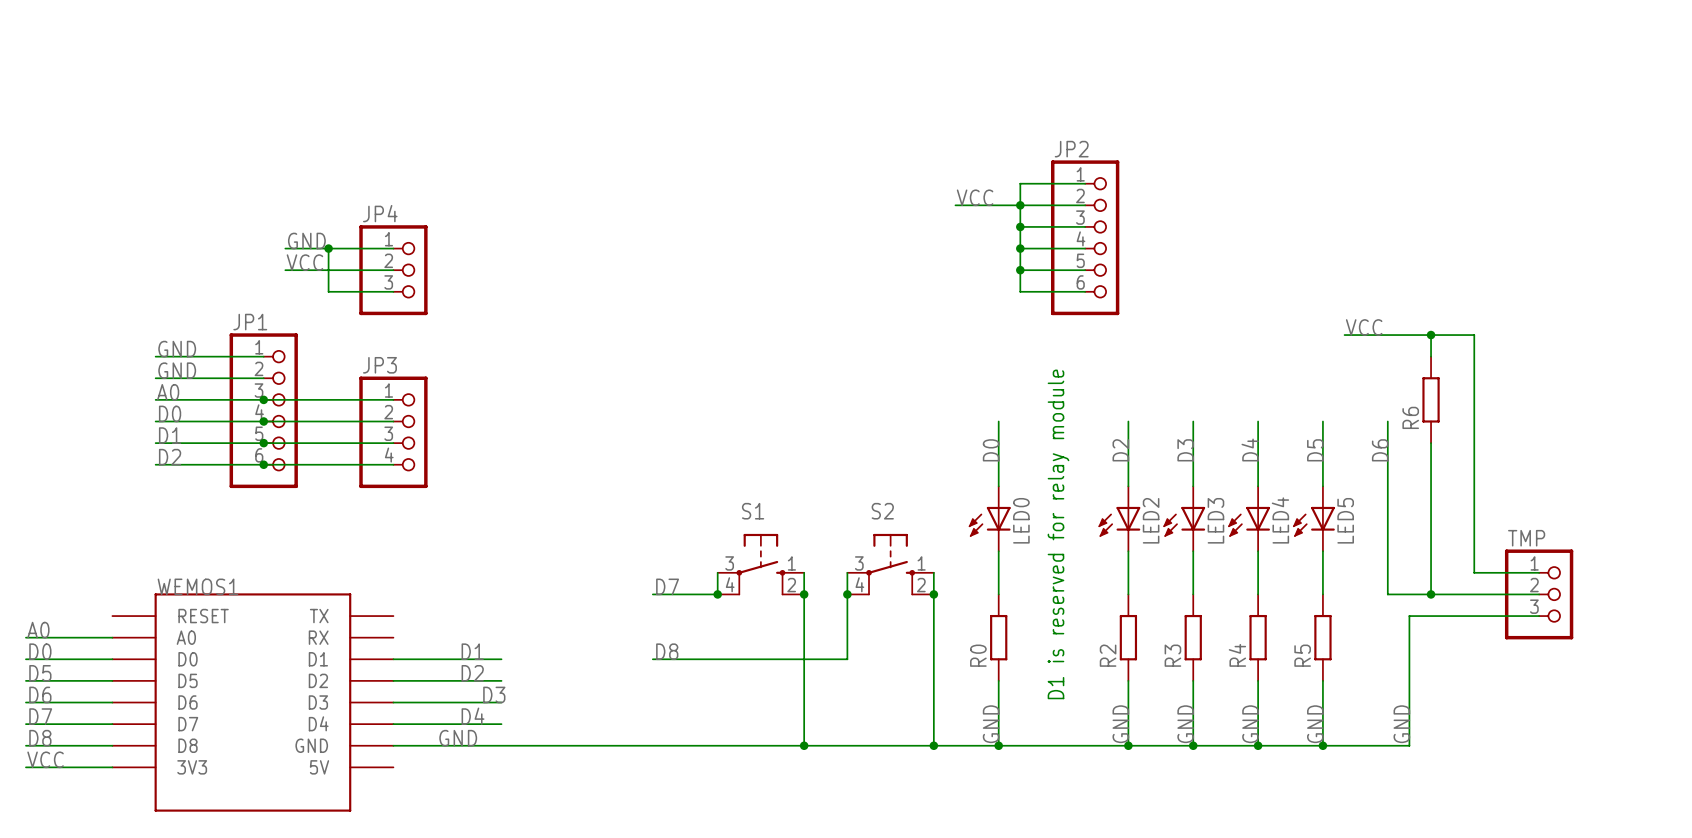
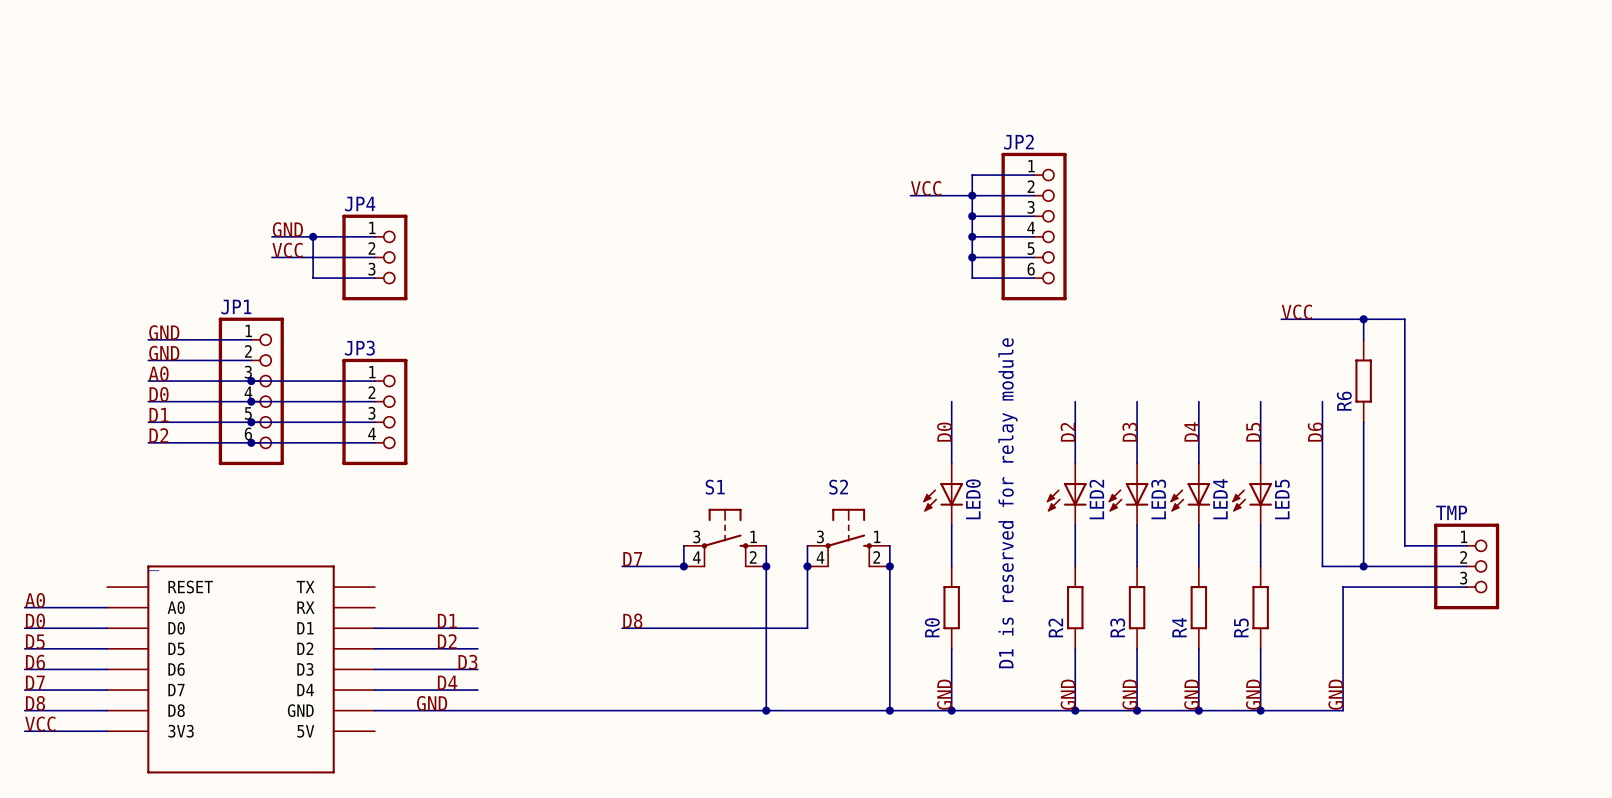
WEMOS1 name: WEMOS1 (197, 586) -> _ (153, 570)

